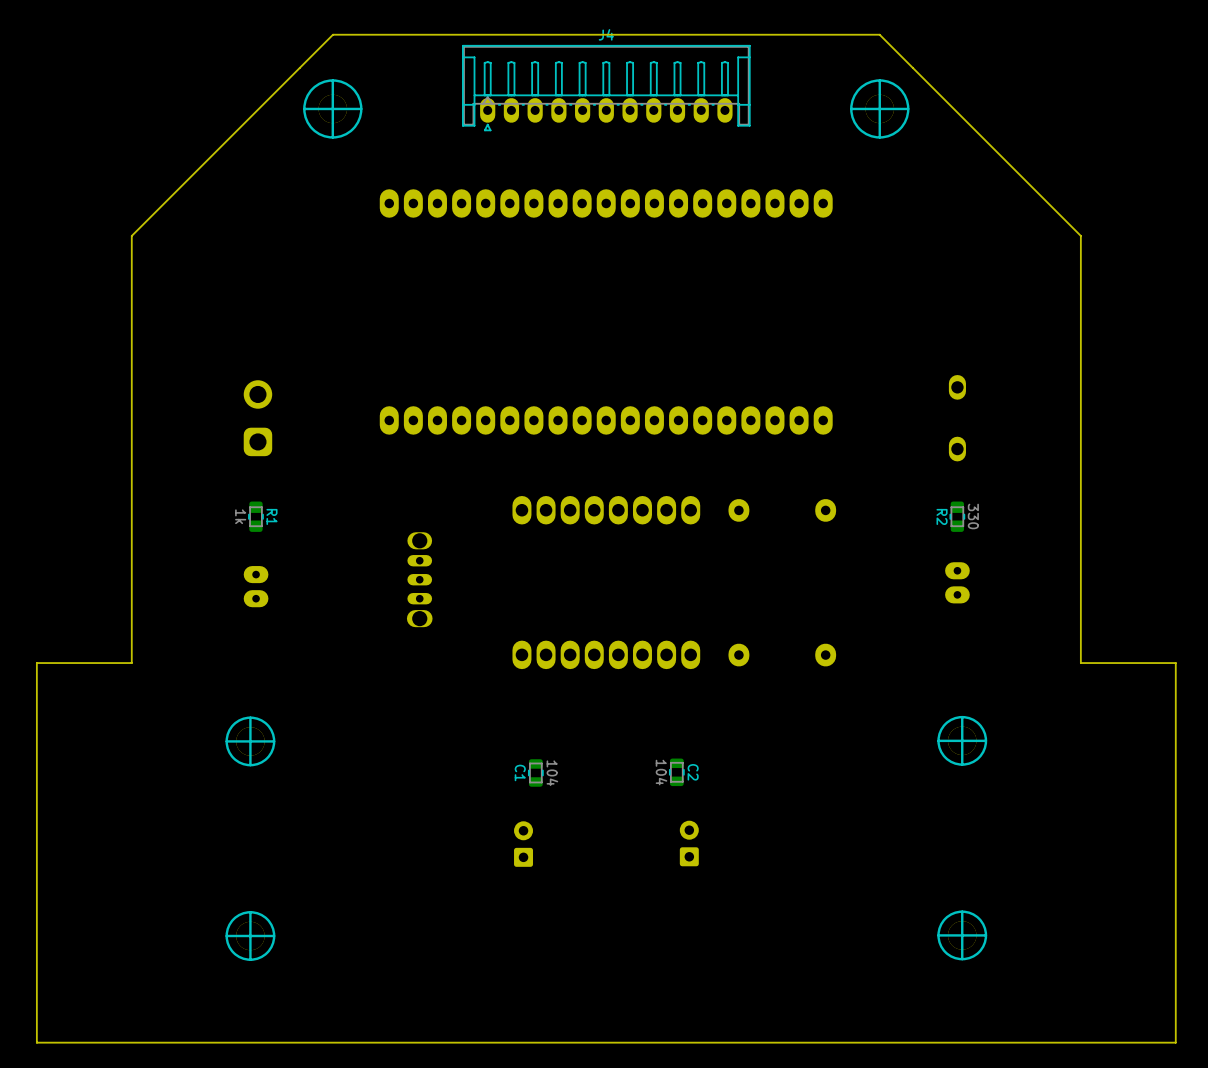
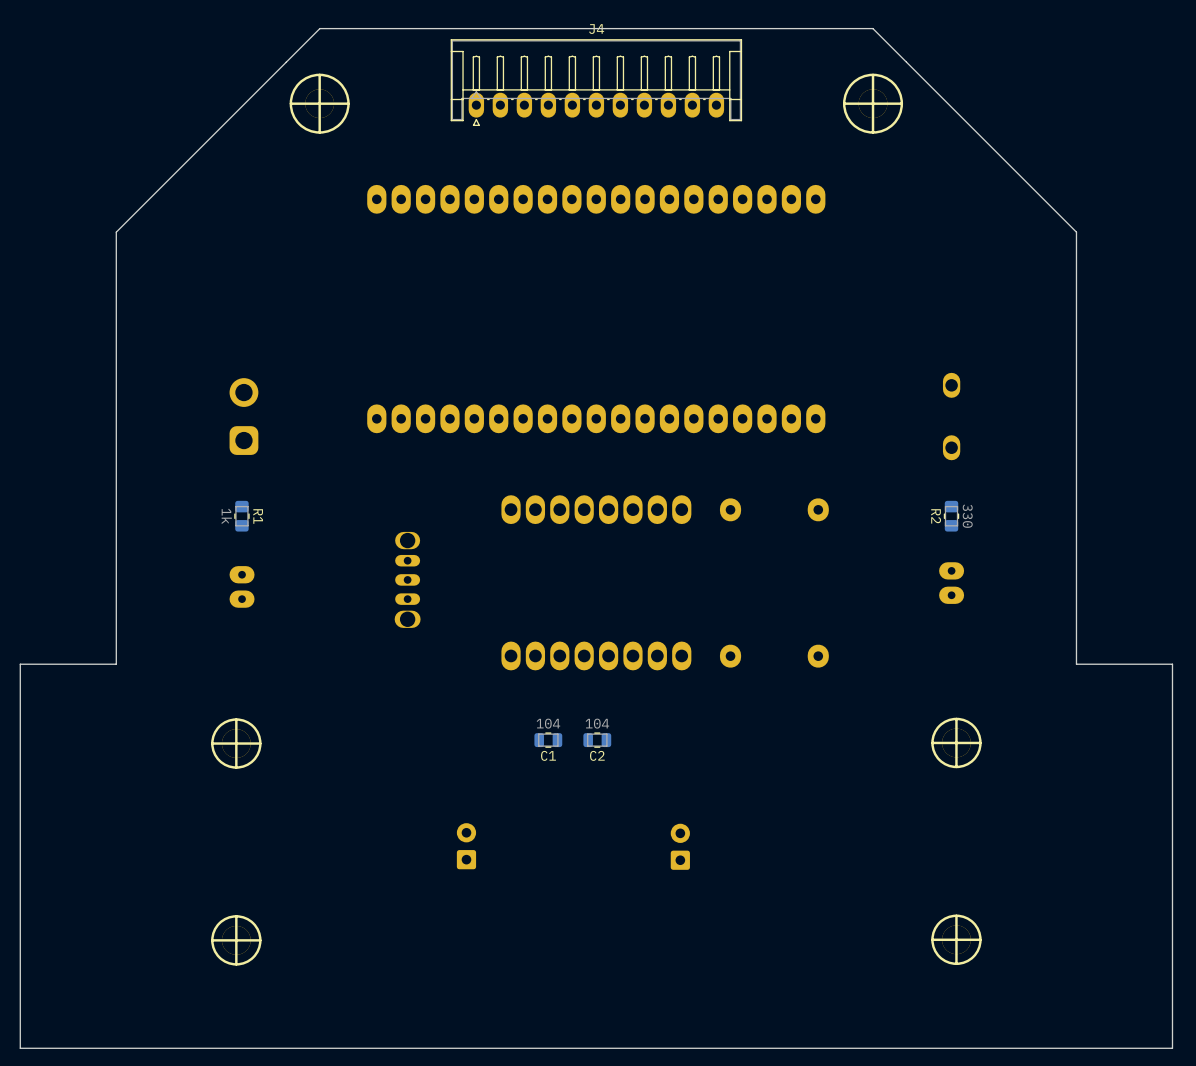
C1 name position: C1 (520, 772) -> C1 (548, 755)
C1 rotation: 0° (535, 772) -> 90° clockwise (548, 740)
C1 position: (535, 772) -> (548, 740)
C2 rotation: 0° (676, 772) -> 90° clockwise (597, 740)
C2 position: (676, 772) -> (597, 740)
C1 value position: 104 (552, 773) -> 104 (548, 723)
part position: (523, 844) -> (466, 846)

